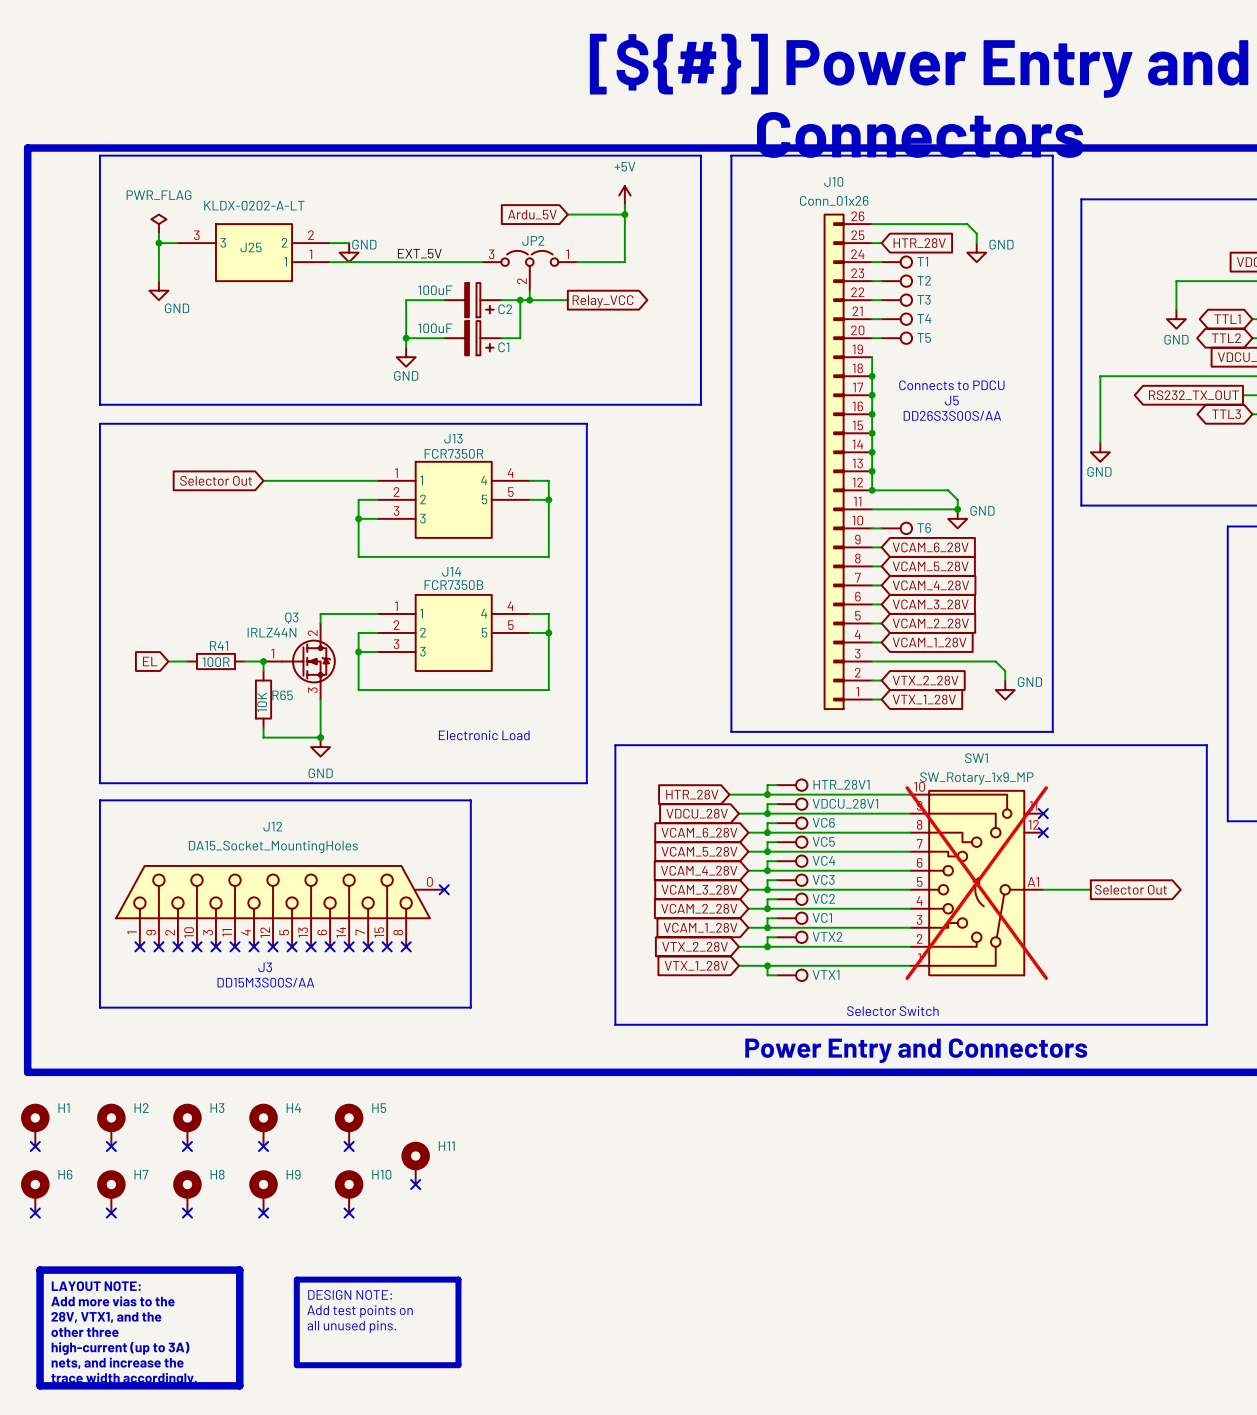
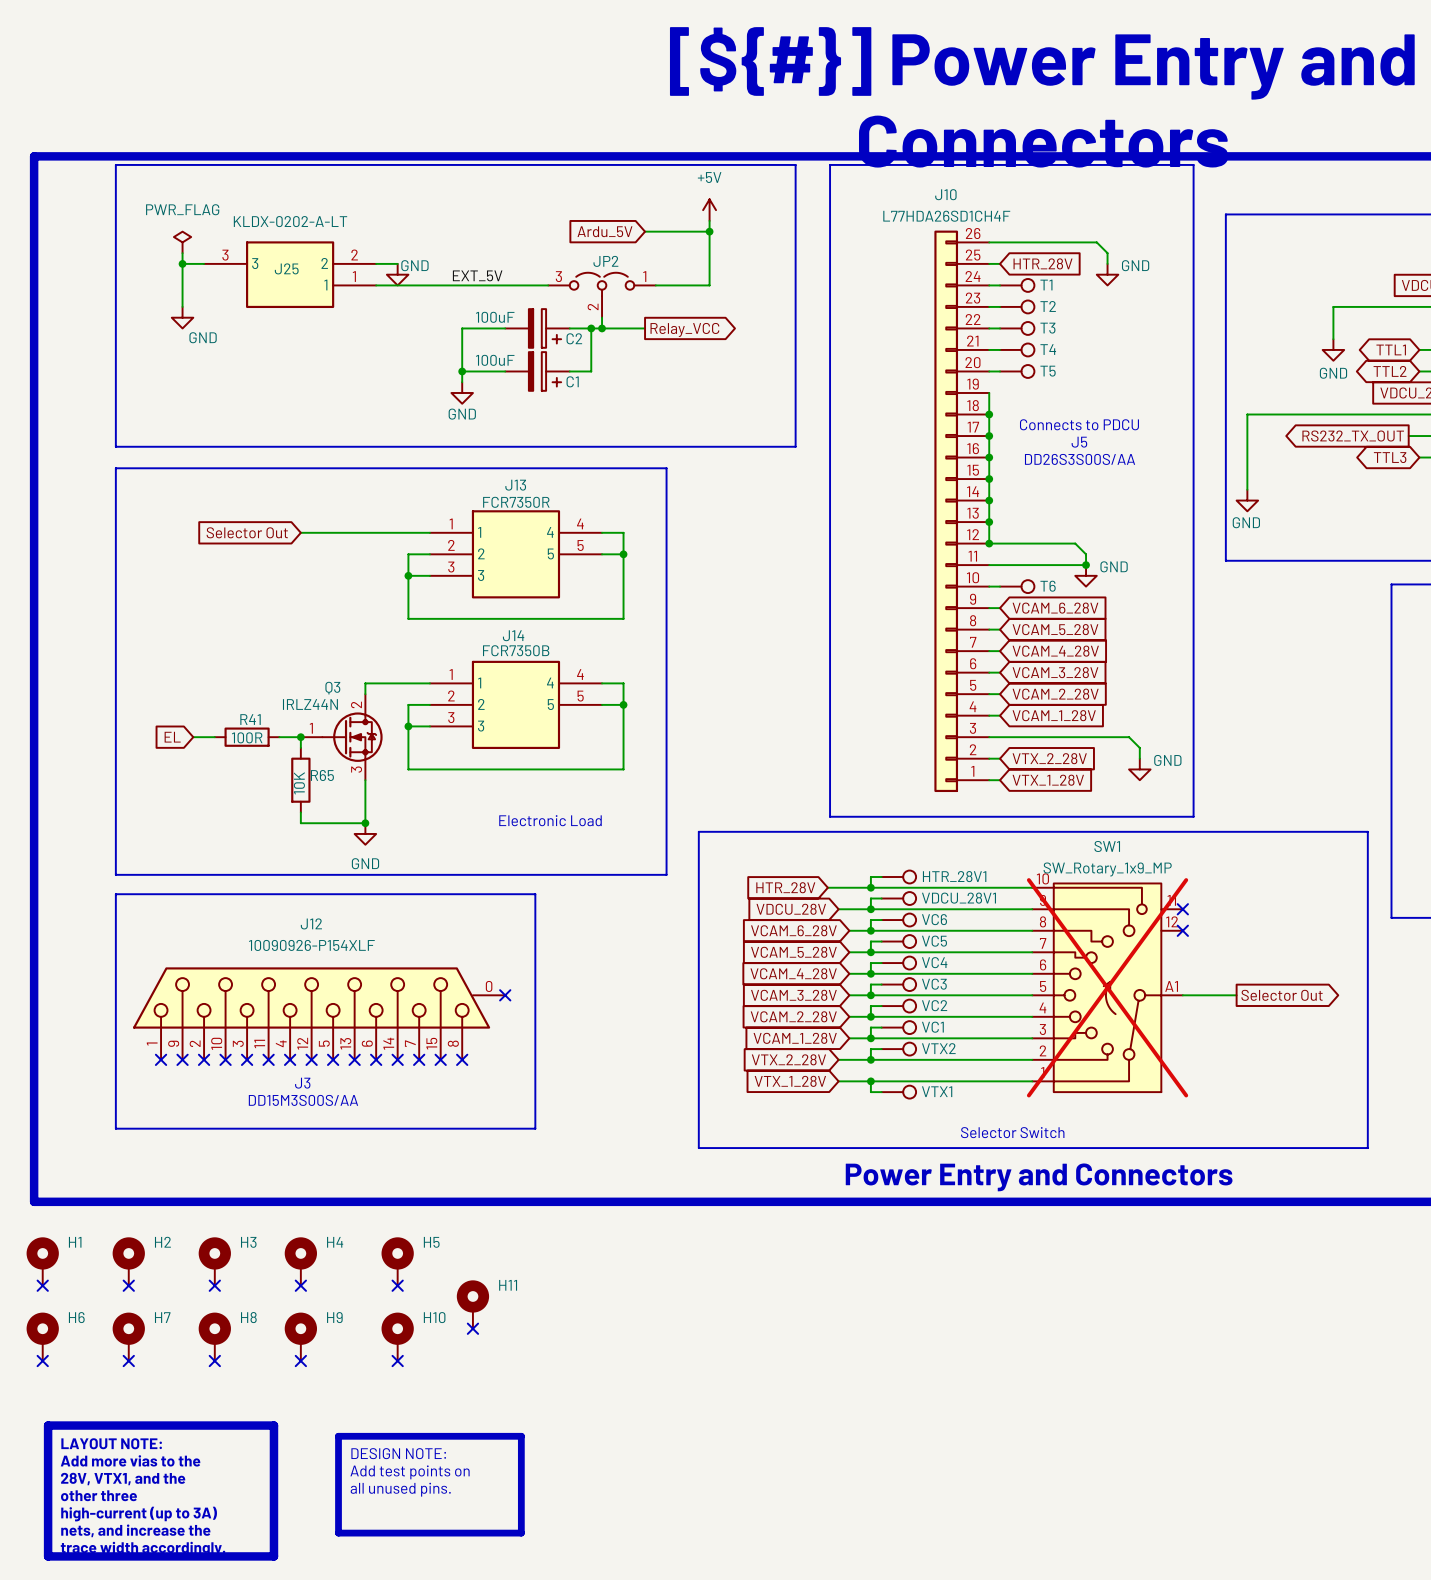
J10 value: Conn_01x26 (834, 200) -> L77HDA26SD1CH4F (946, 216)
J12 value: DA15_Socket_MountingHoles (273, 846) -> 10090926-P154XLF (311, 945)

